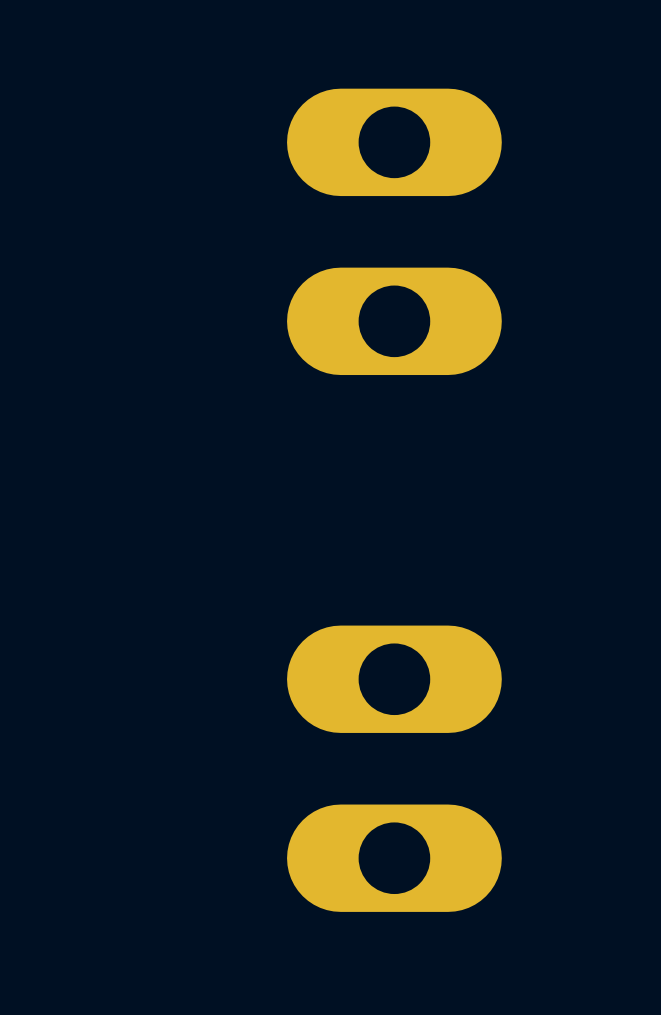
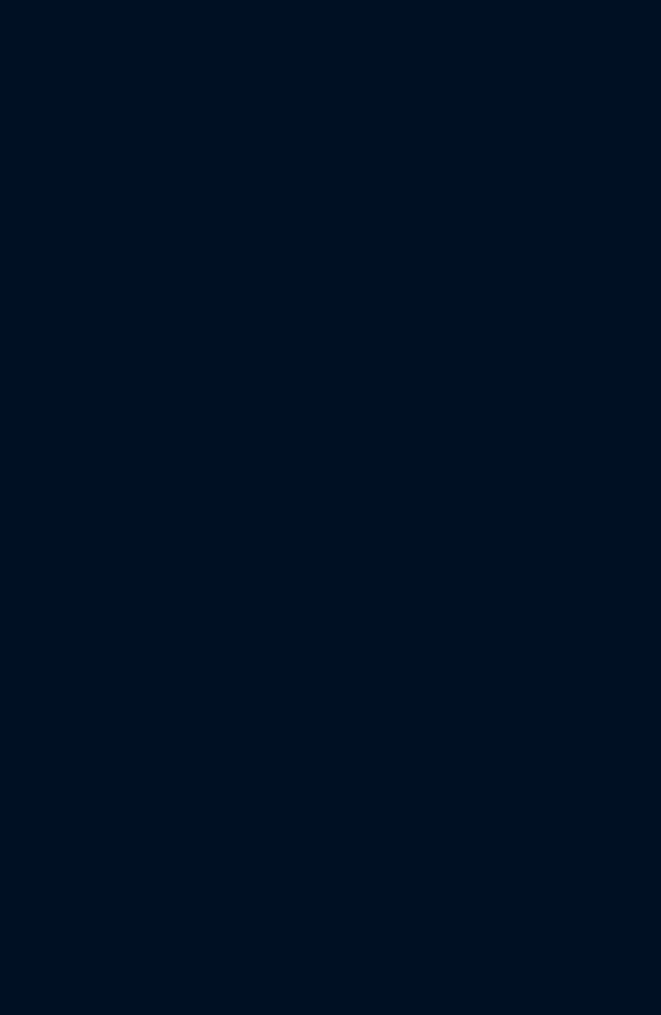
part: (394, 231) -> none
part: (394, 768) -> none

